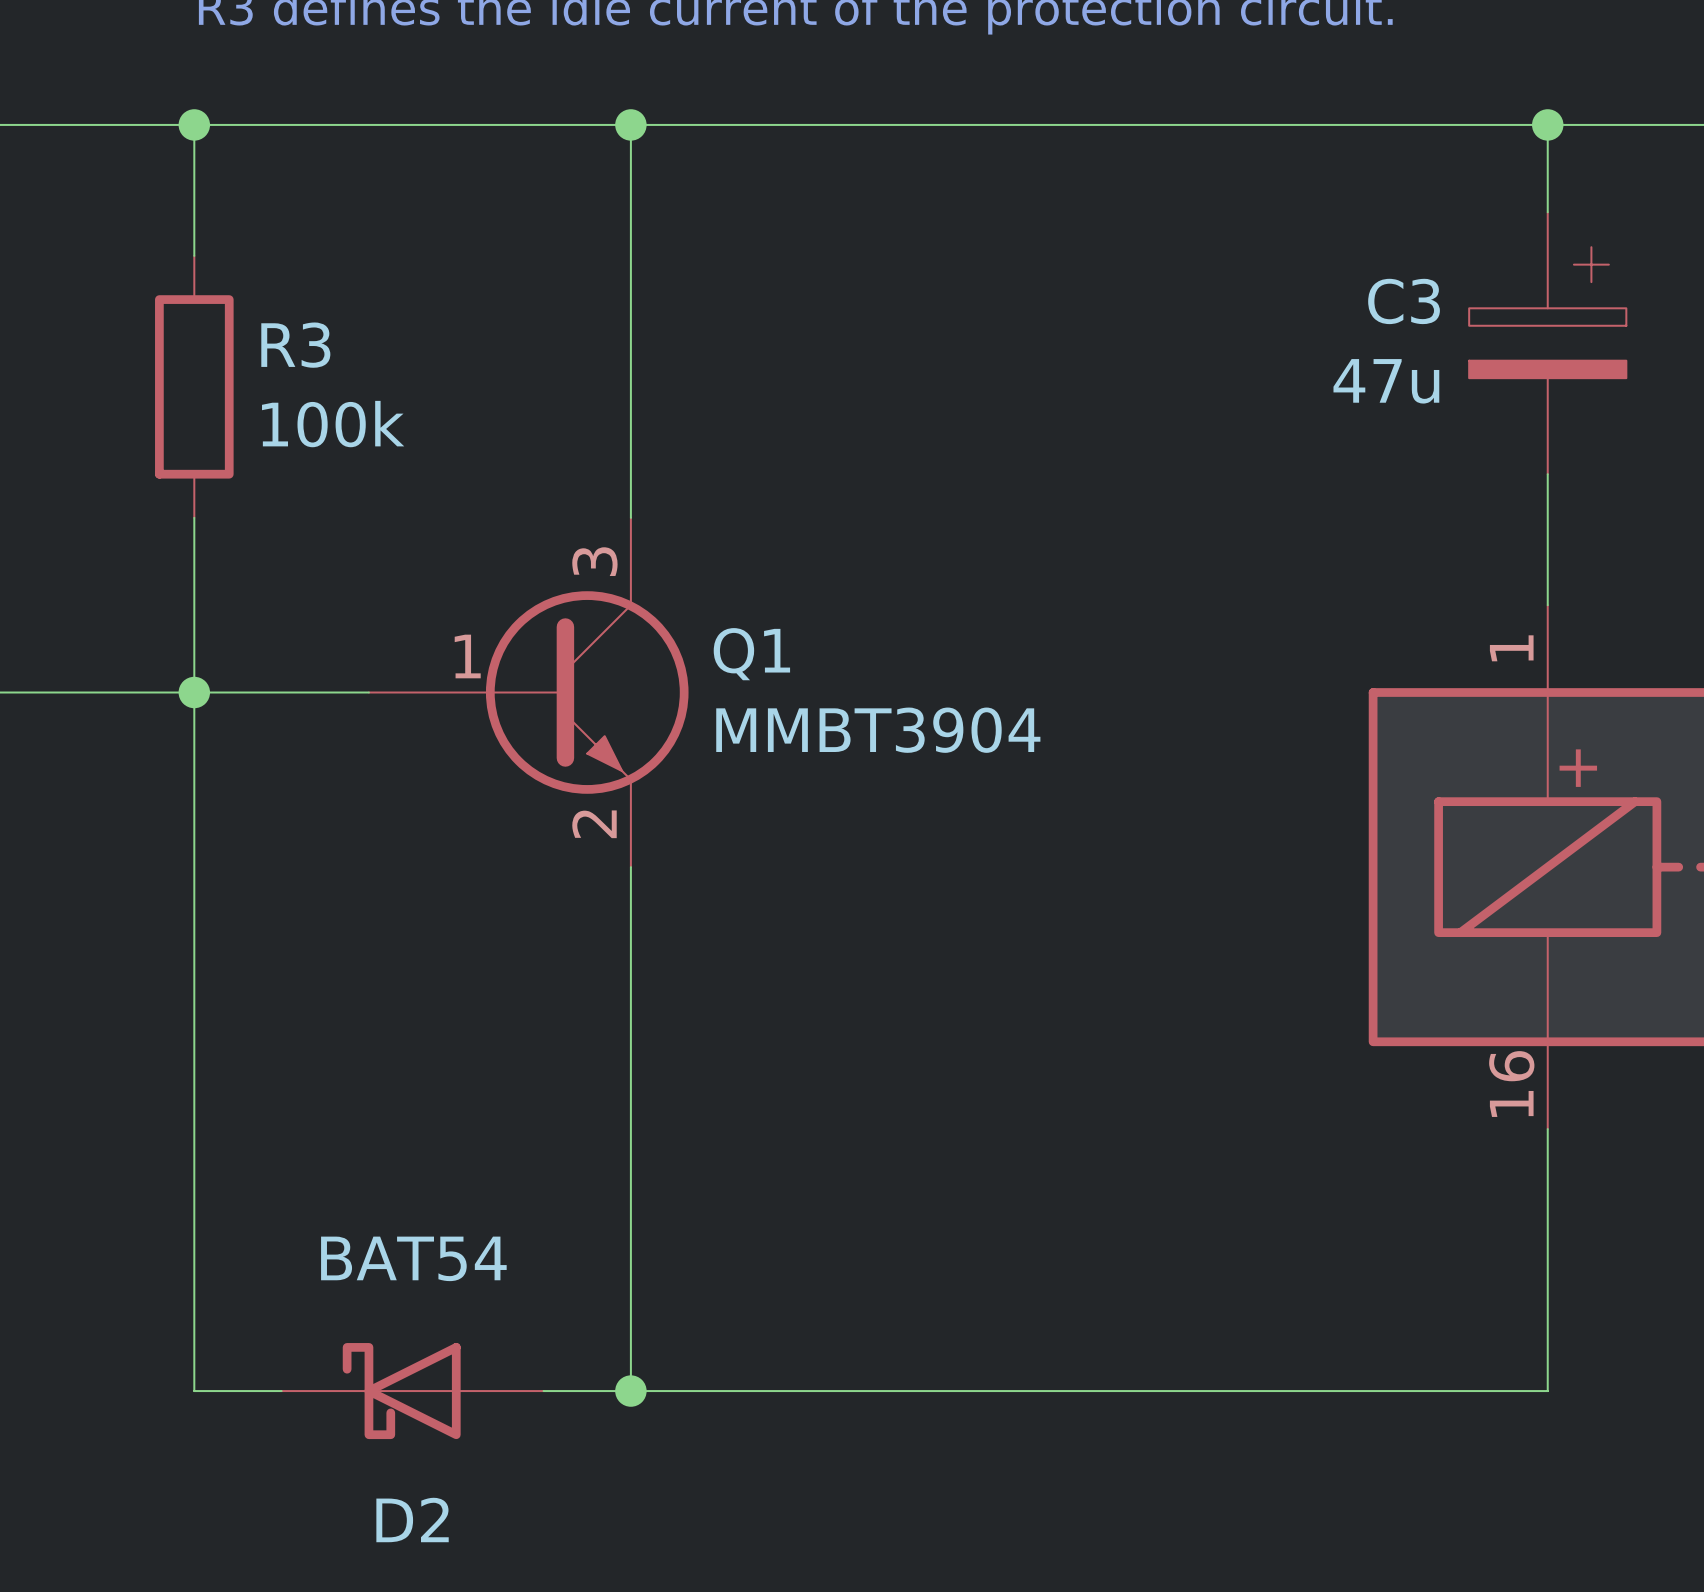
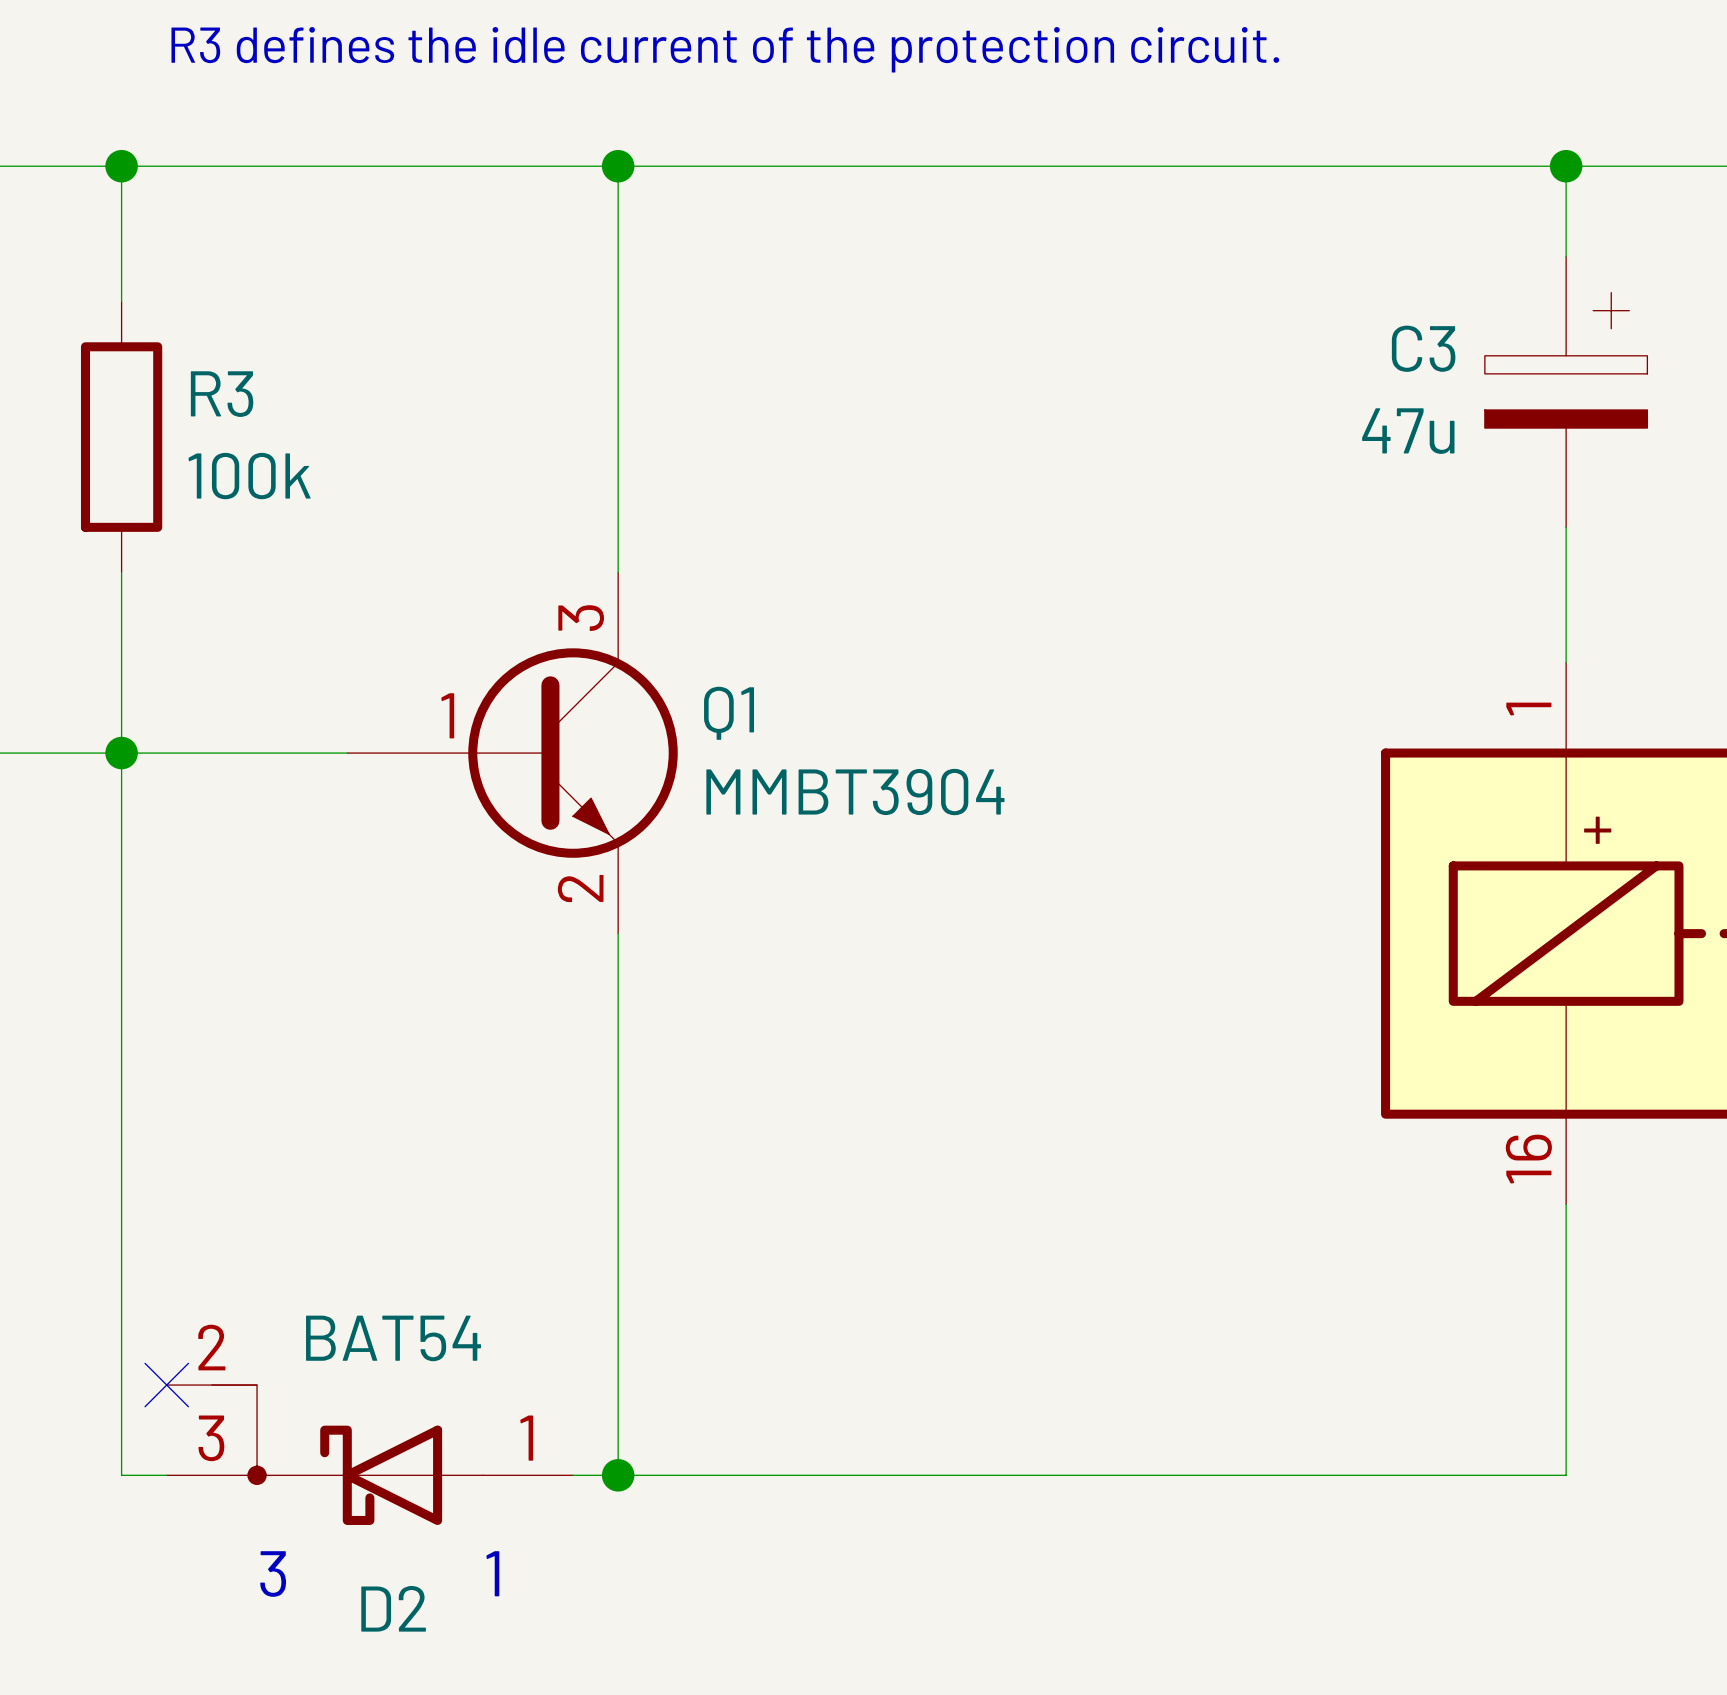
wire: (194, 124) (194, 255) -> (121, 166) (121, 301)
junction position: (194, 124) -> (121, 166)
R3 position: (194, 386) -> (121, 437)
wire: none -> (121, 572) (121, 1475) (166, 1475)
wire: (194, 517) (194, 1391) (281, 1391) -> none
junction position: (194, 692) -> (121, 753)
no-connect mark: none -> (166, 1385)
D2 symbol: [281, 1343, 544, 1440] -> [166, 1385, 574, 1525]
text: none -> 3 (273, 1574)
text: none -> 1 (492, 1573)

